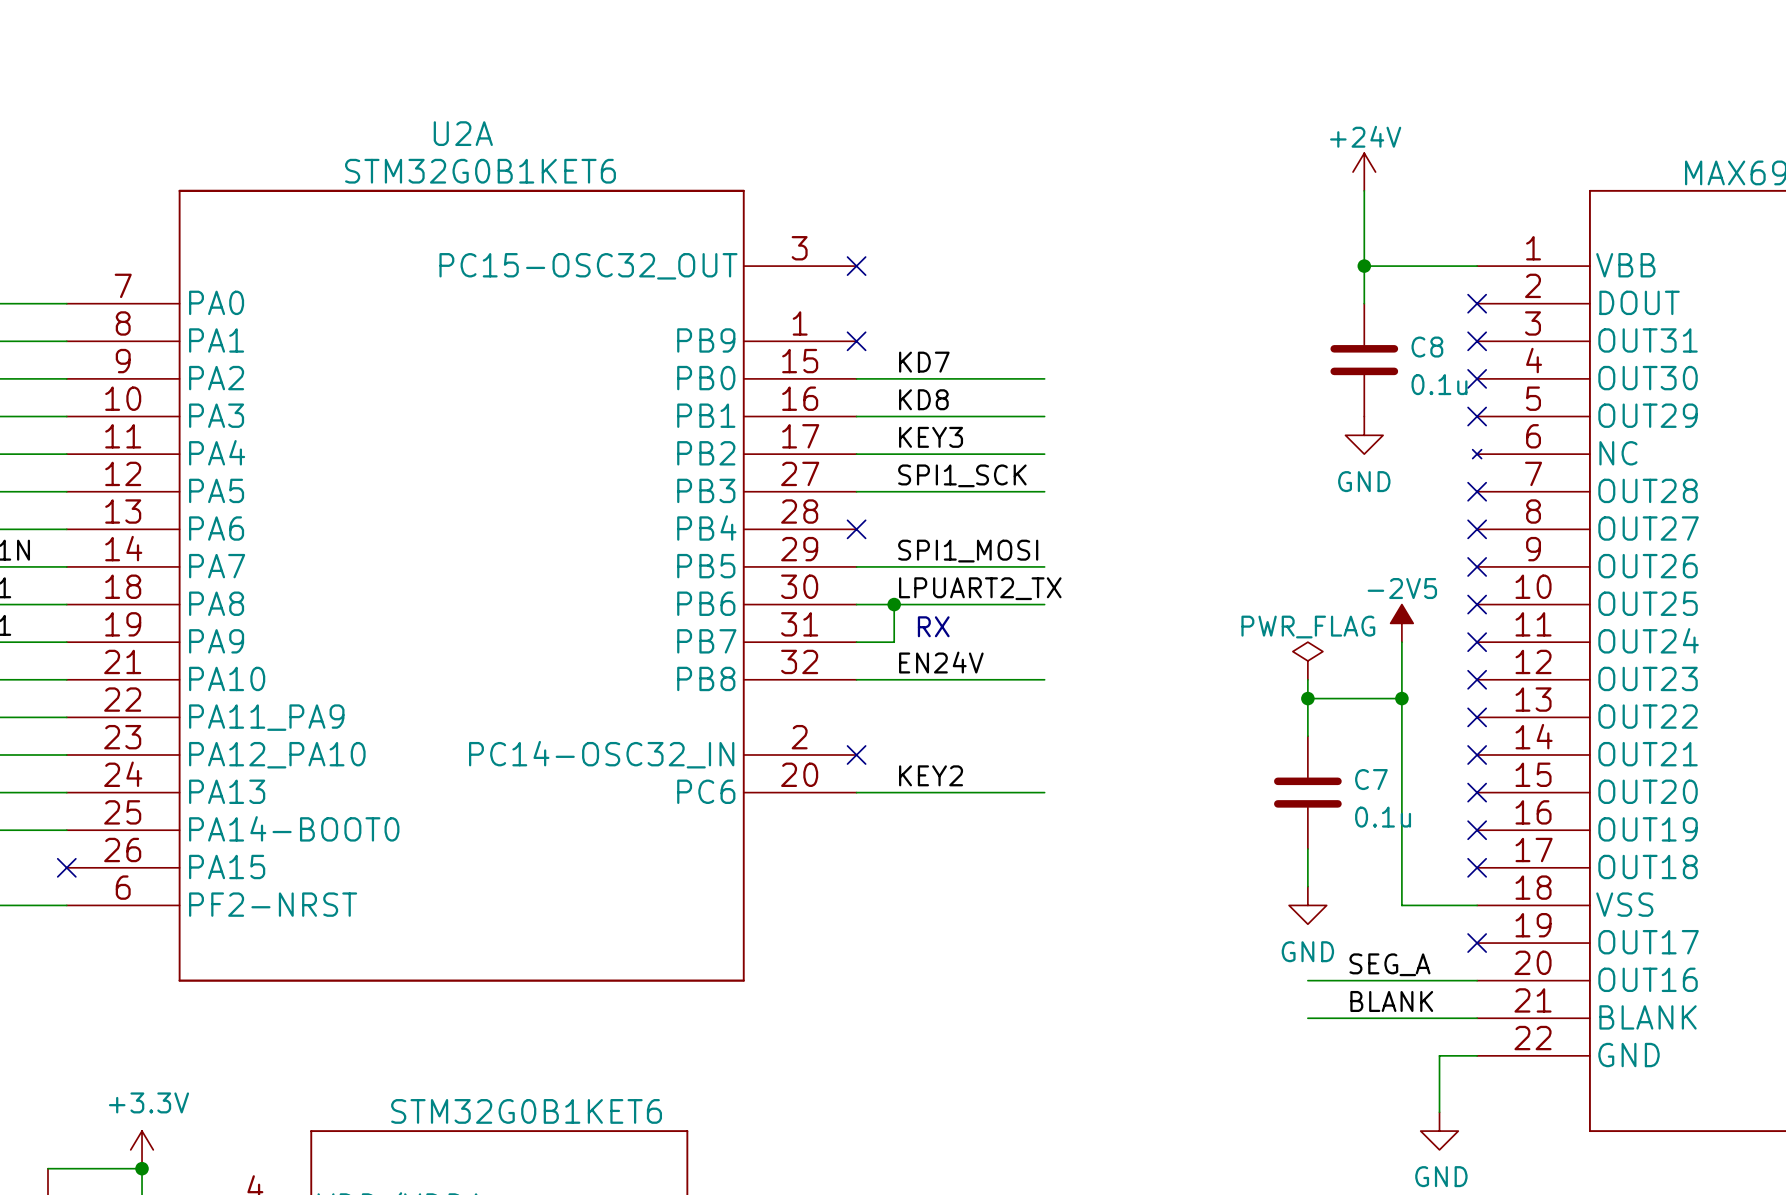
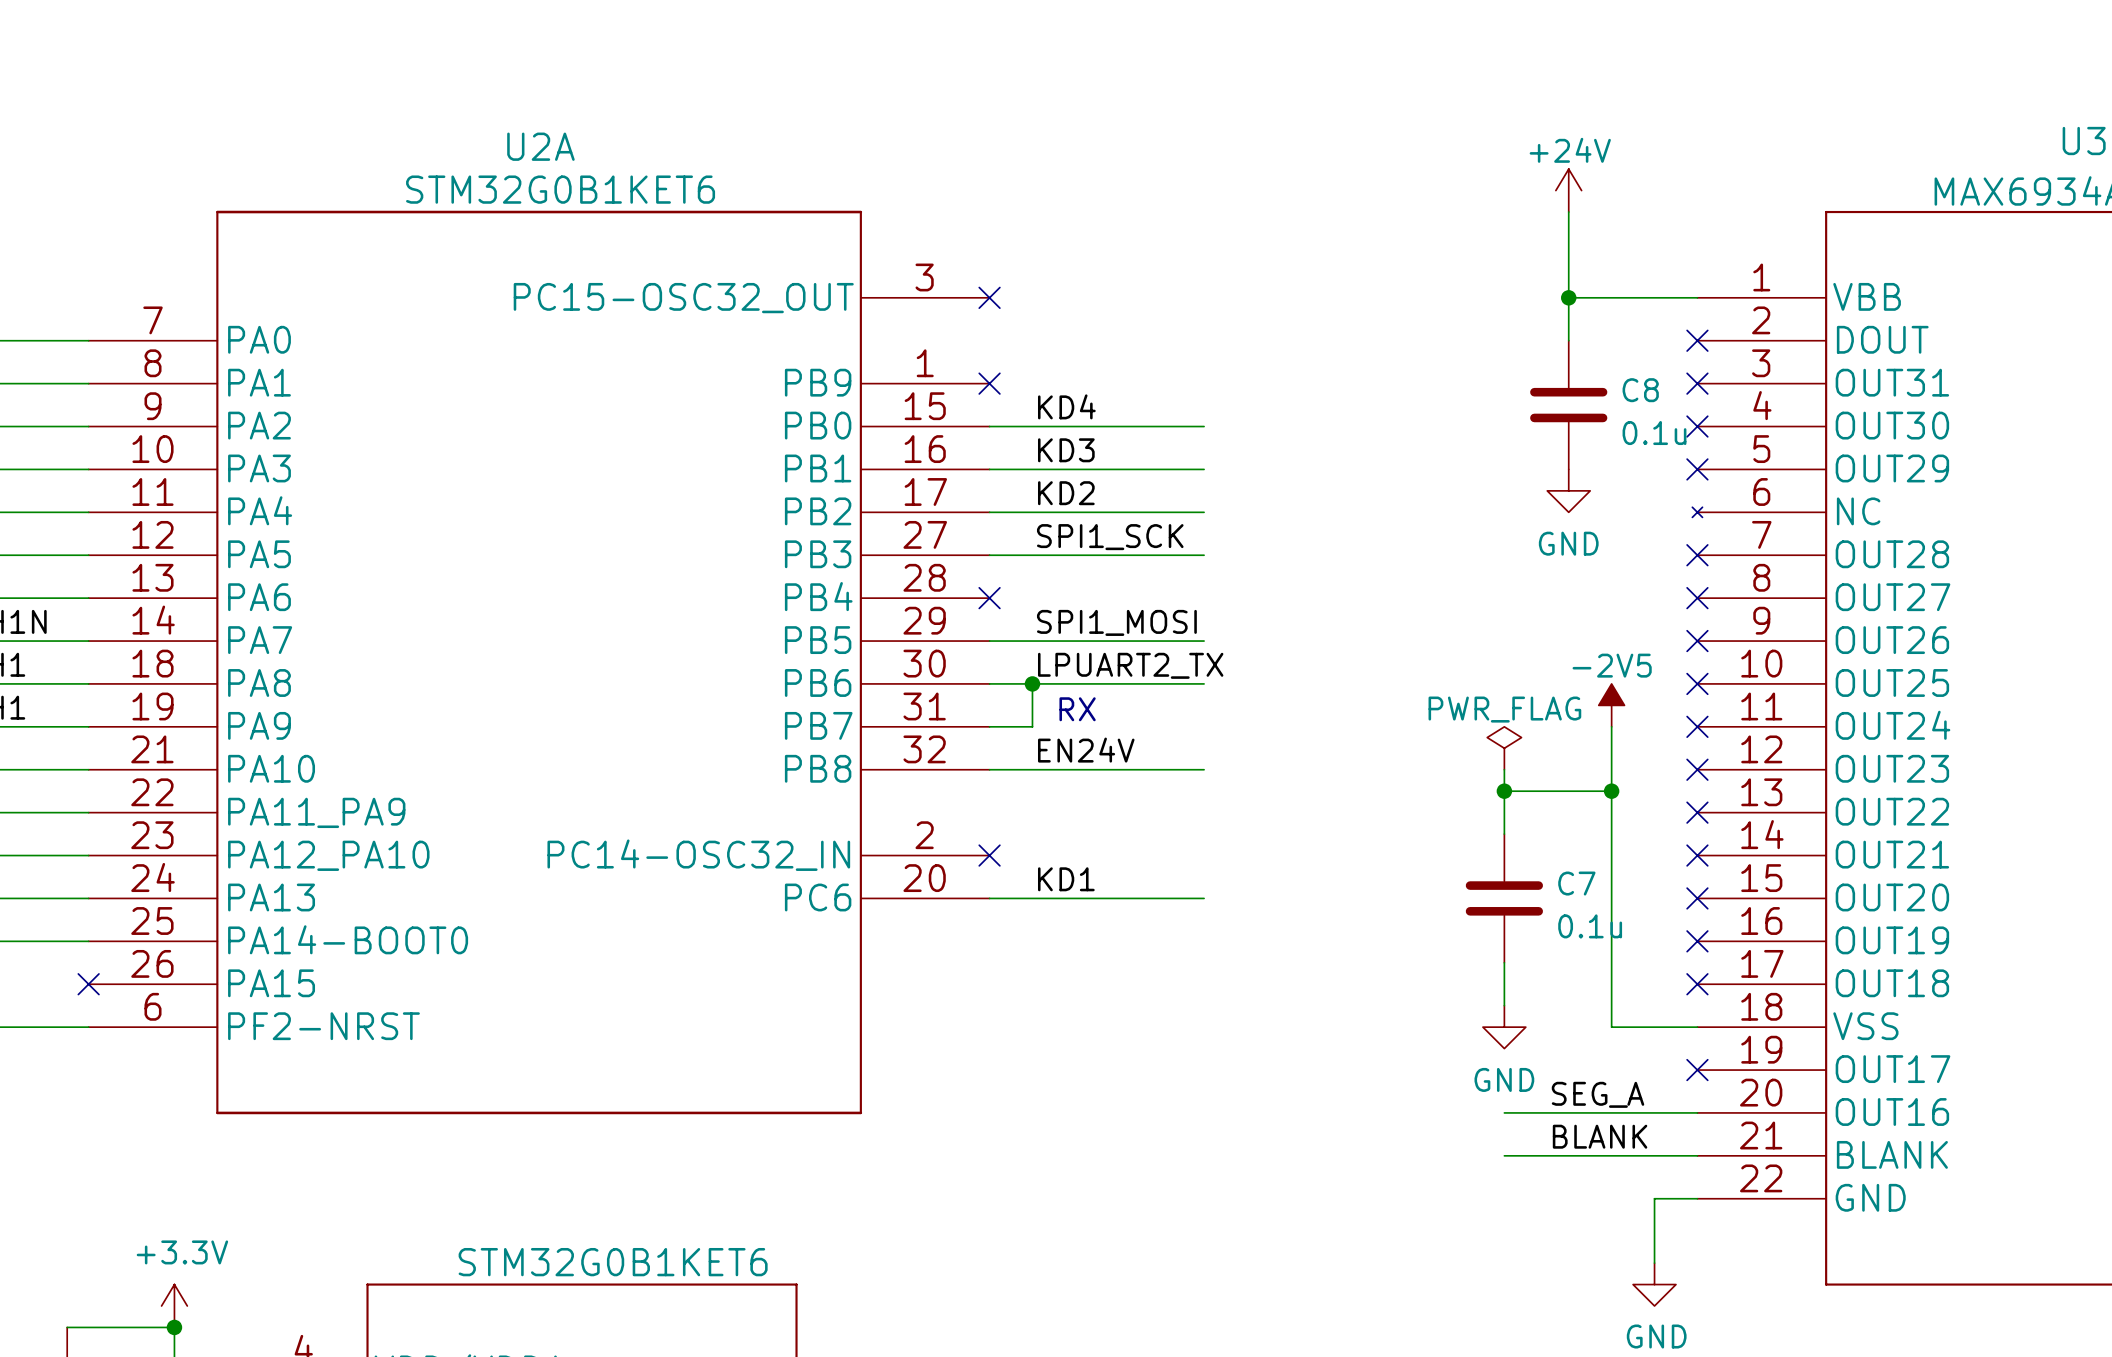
label: KD7 (924, 362) -> KD4 (1066, 406)
label: KD8 (923, 399) -> KD3 (1066, 450)
label: KEY3 (931, 437) -> KD2 (1066, 493)
label: KEY2 (931, 775) -> KD1 (1066, 879)

